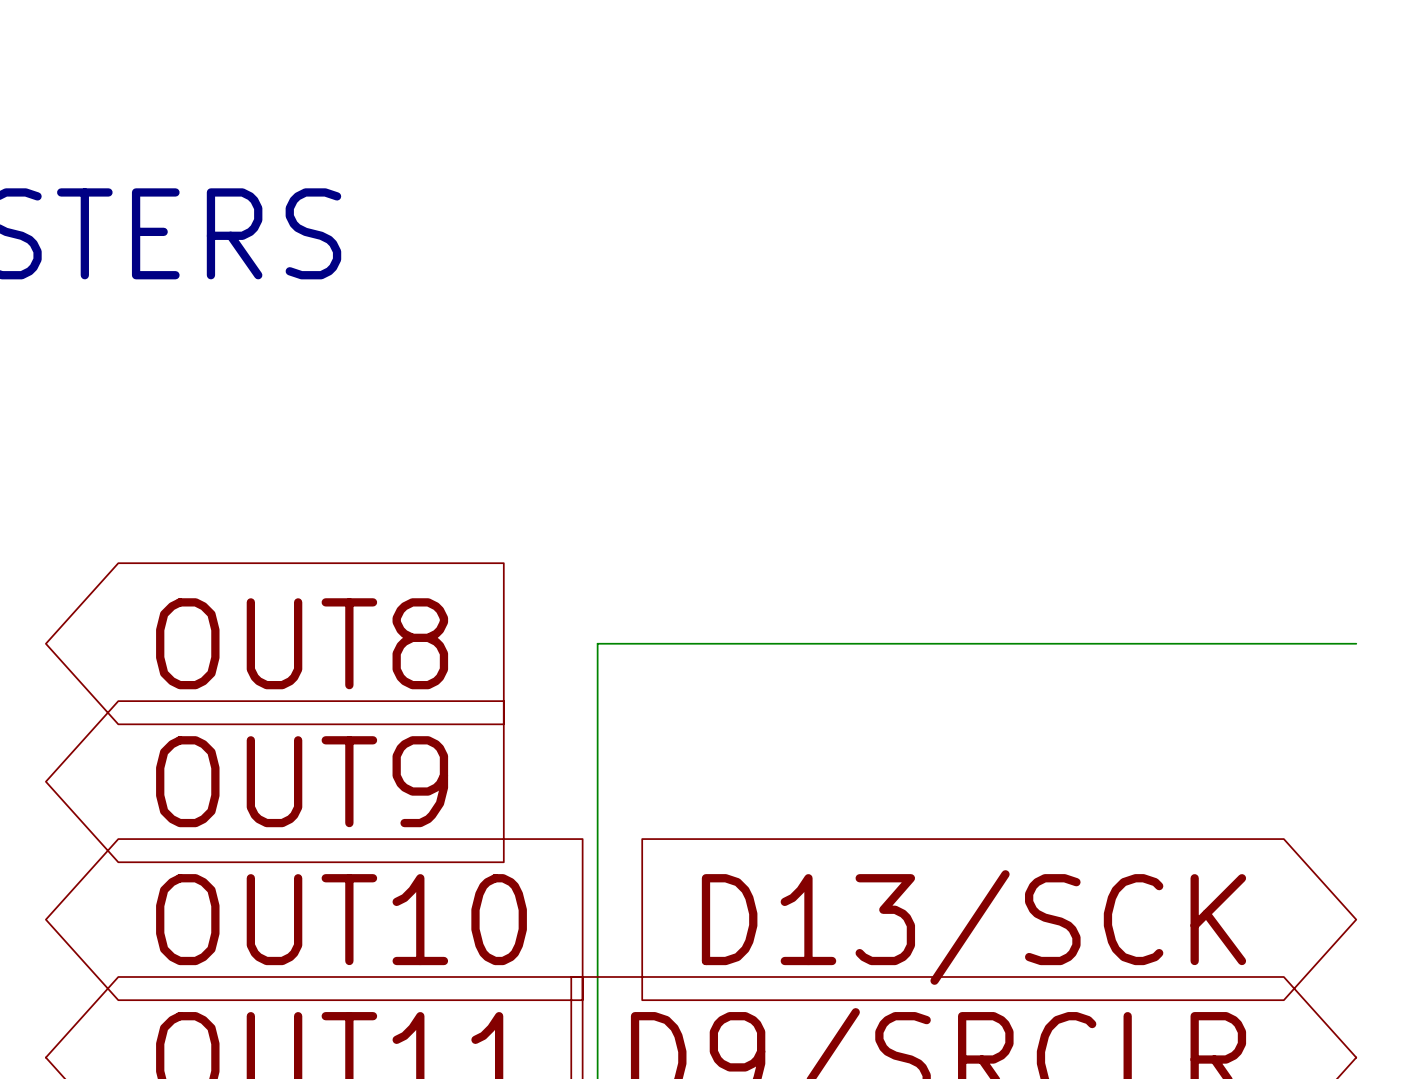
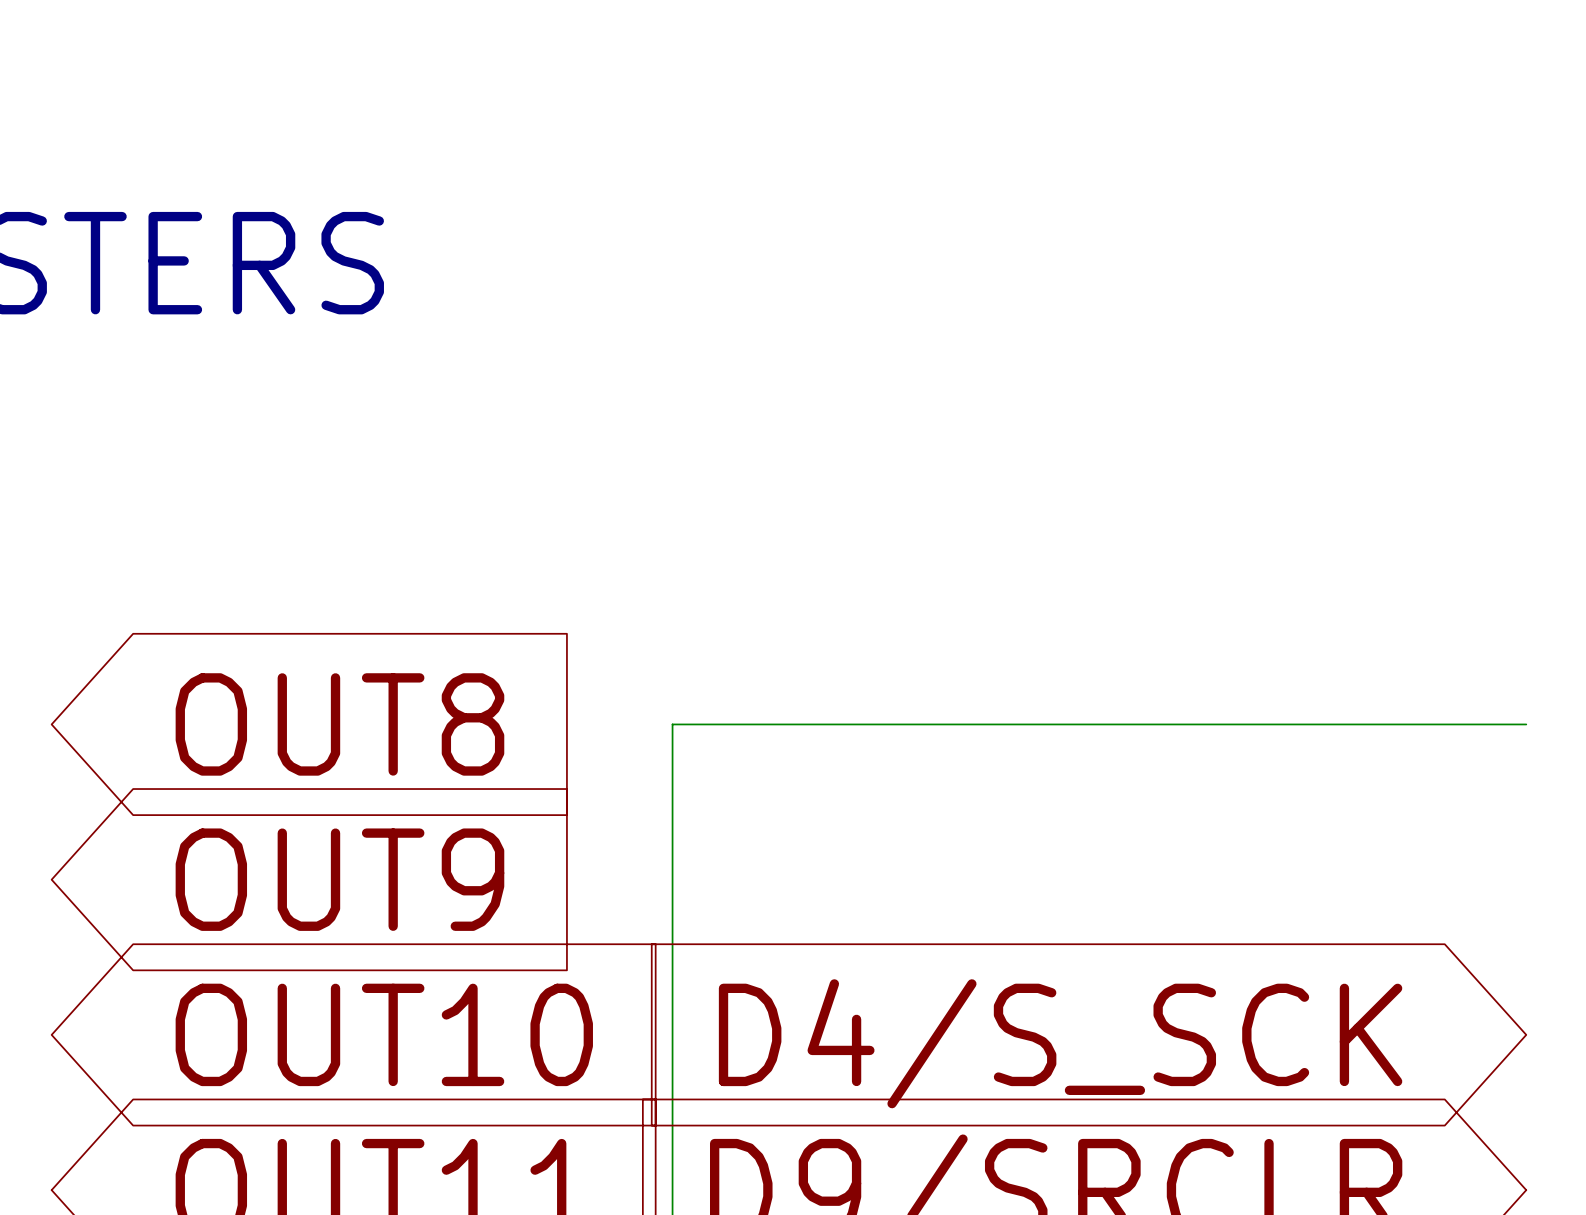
global label: D13/SCK (973, 927) -> D4/S_SCK (1060, 1043)

